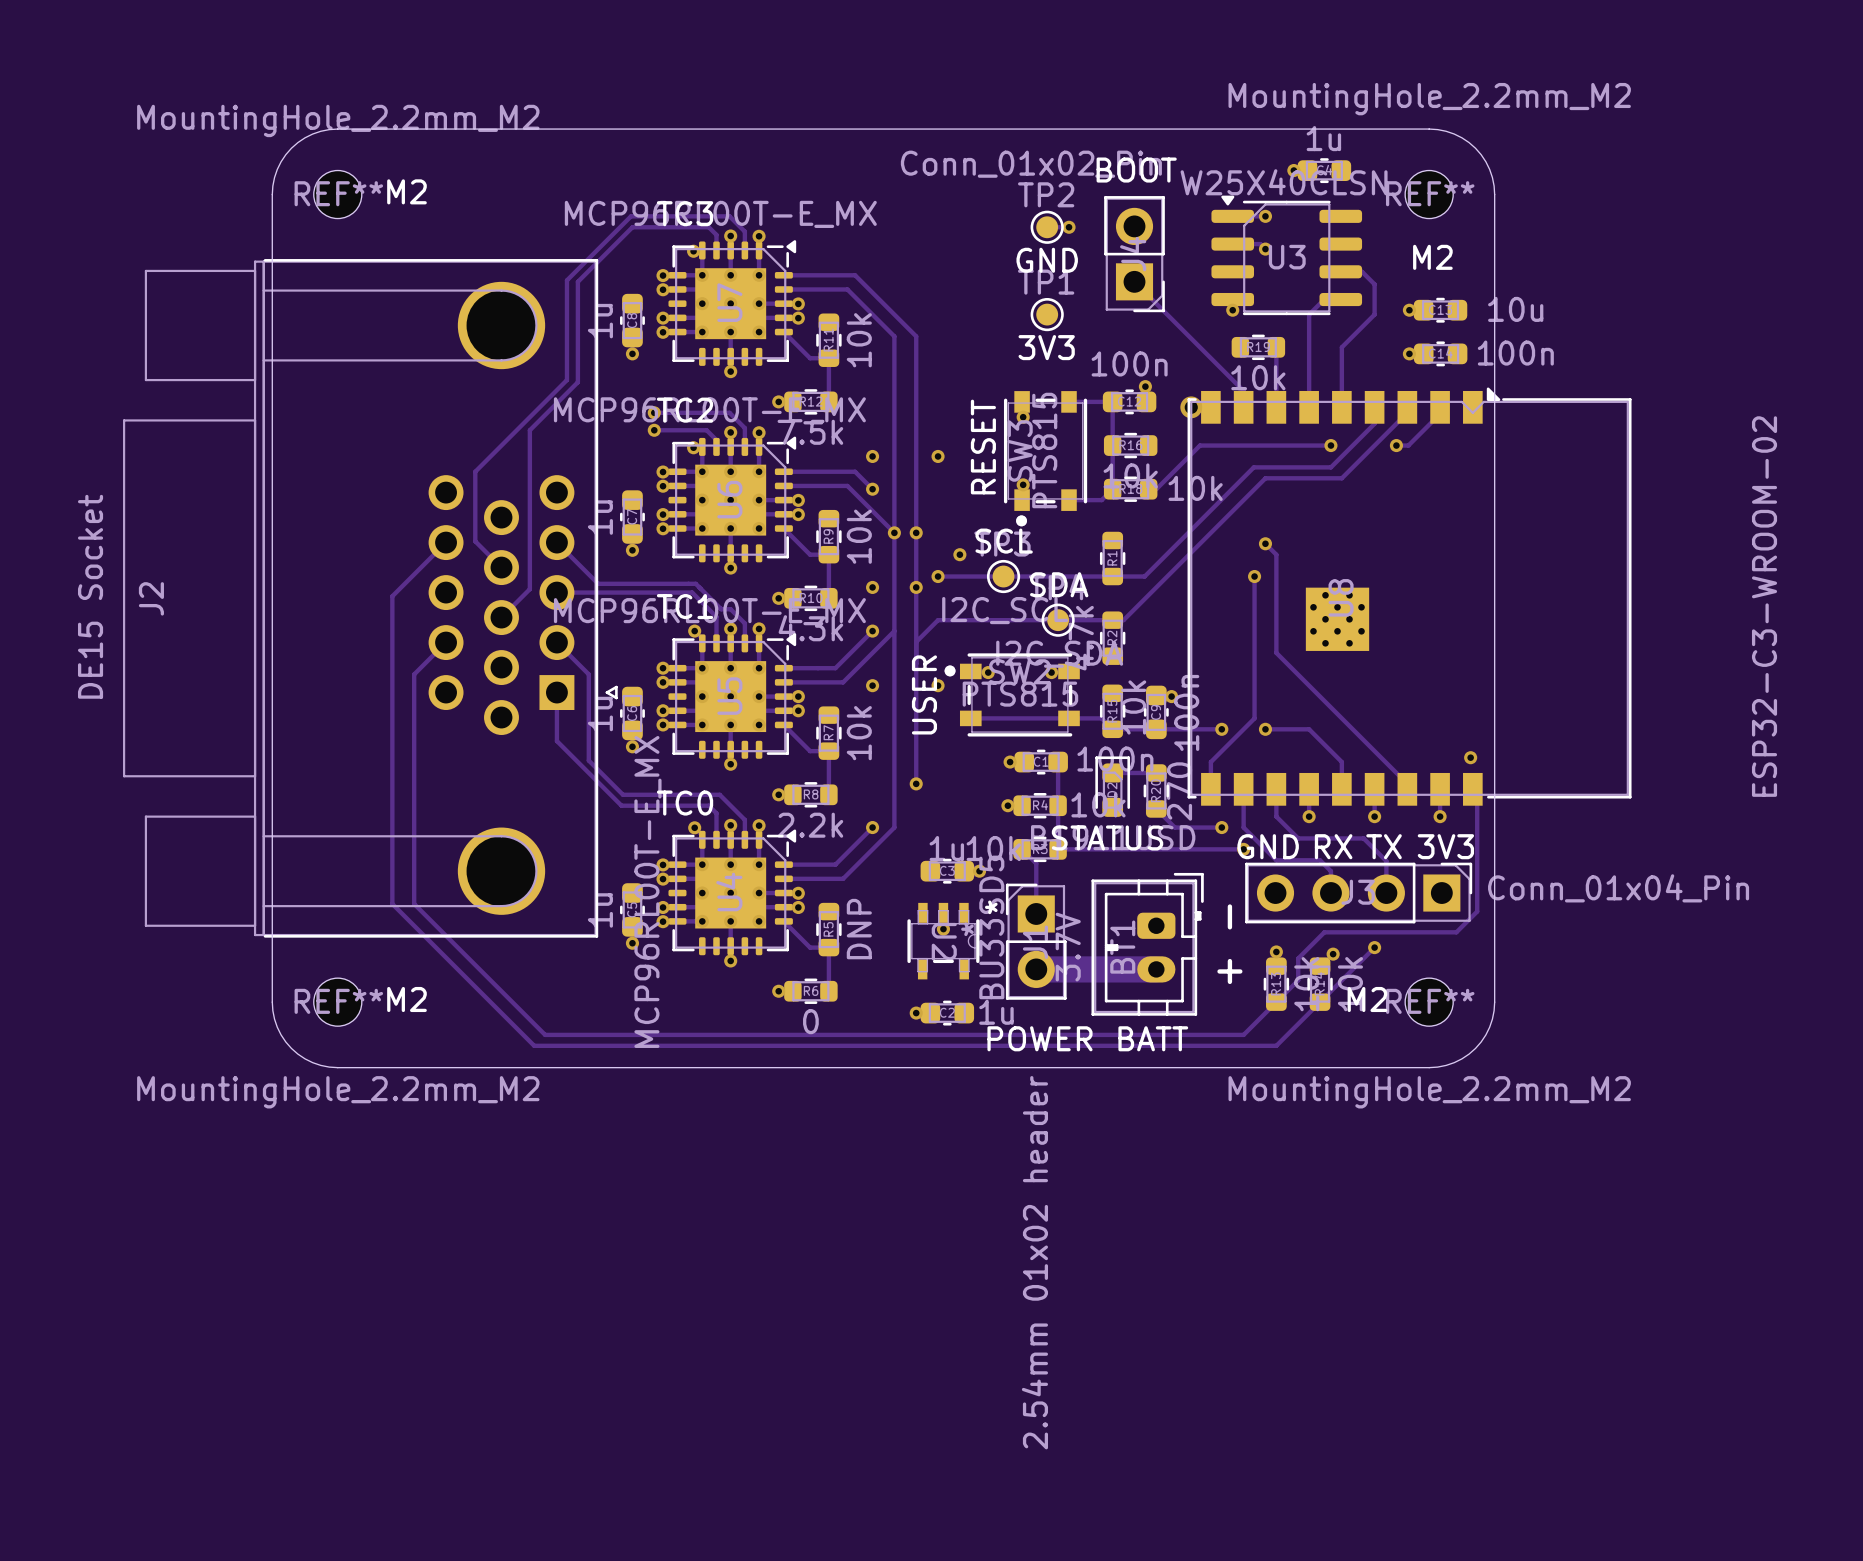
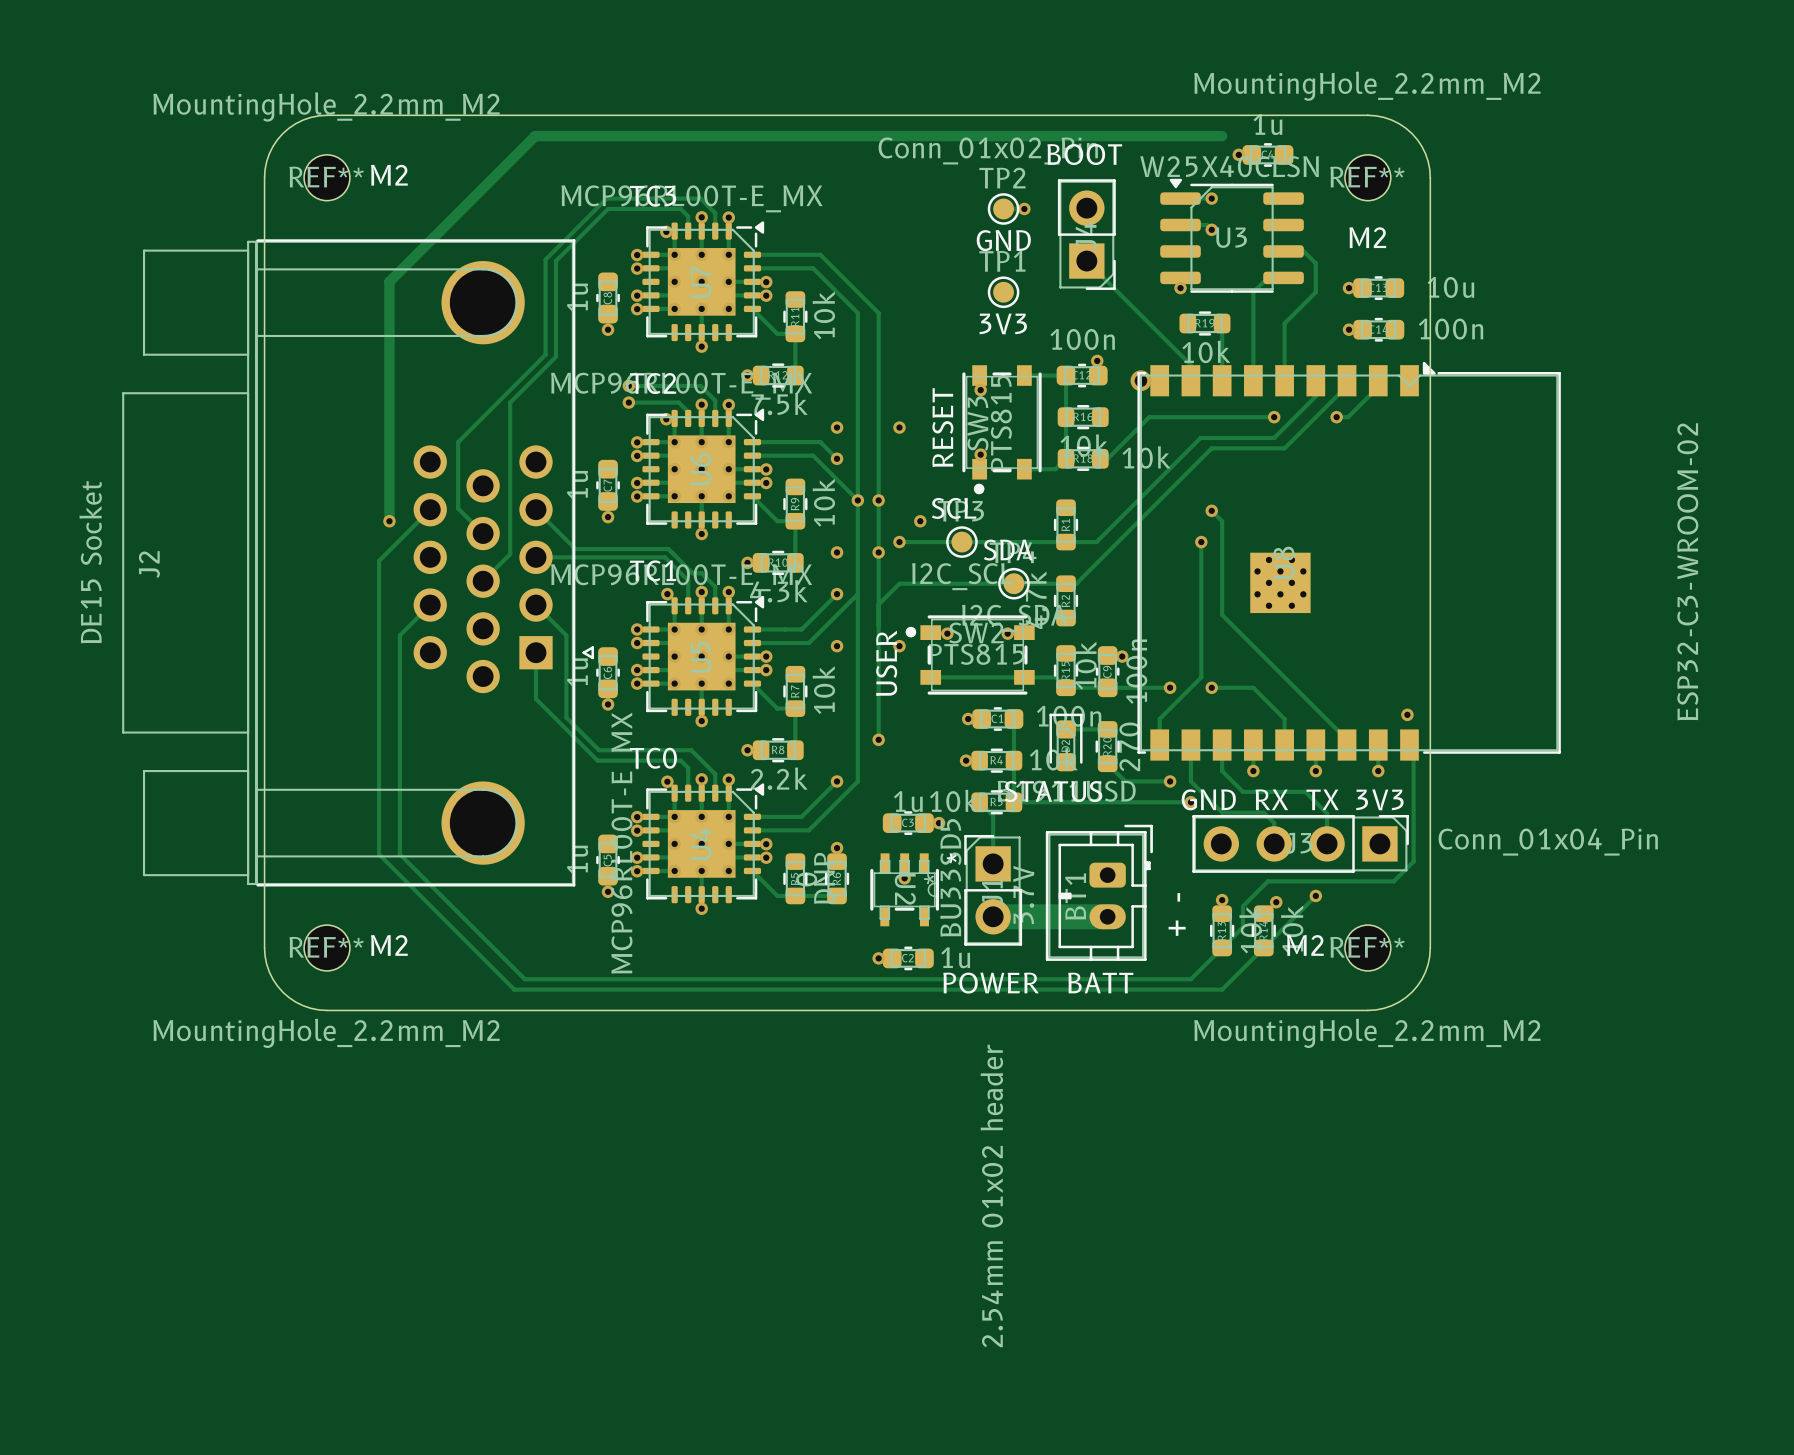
track: none -> (1222, 136) (535, 136) (389, 281) (389, 521)
via: none -> (389, 521)
via: none -> (837, 848)
track: (828, 947) (828, 991) -> (795, 895) (837, 895)
via: (778, 991) -> none
R6 rotation: 0° (810, 991) -> 90° clockwise (837, 878)
R6 position: (810, 991) -> (837, 878)

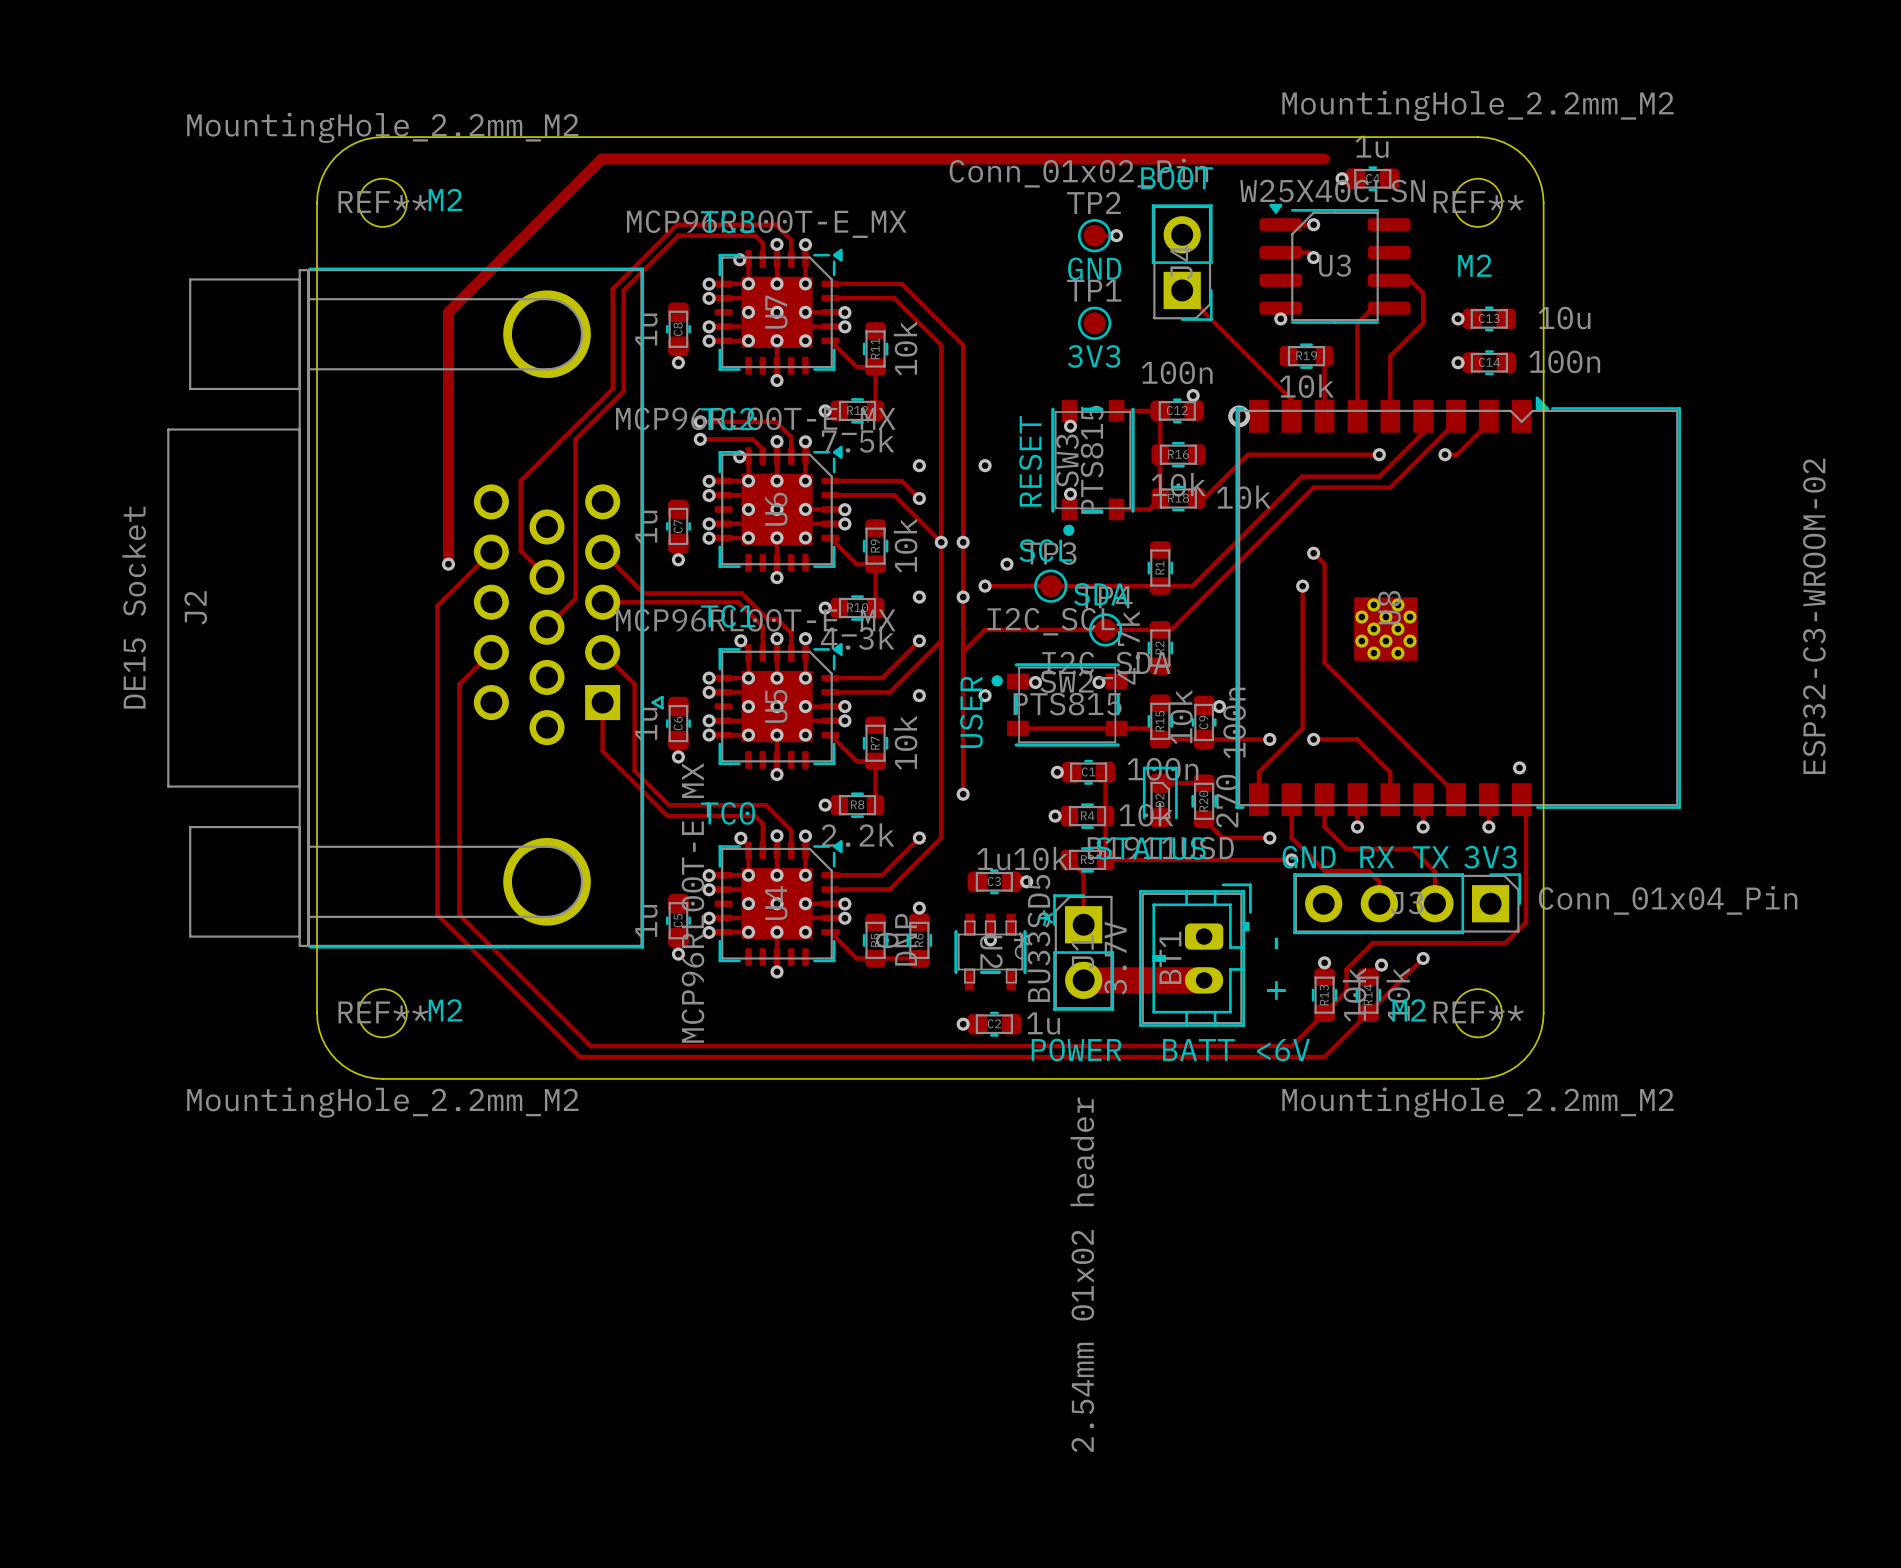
text: BATT (1100, 982) -> BATT <6V (1236, 1050)

